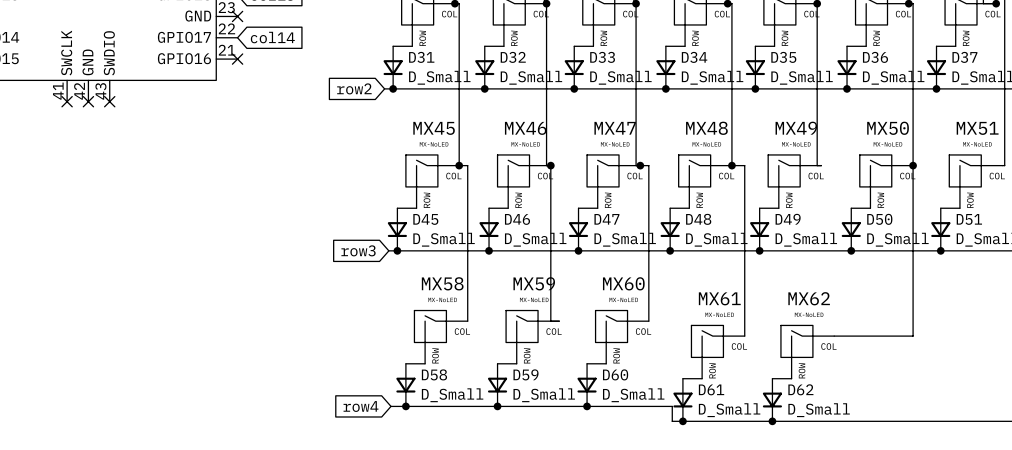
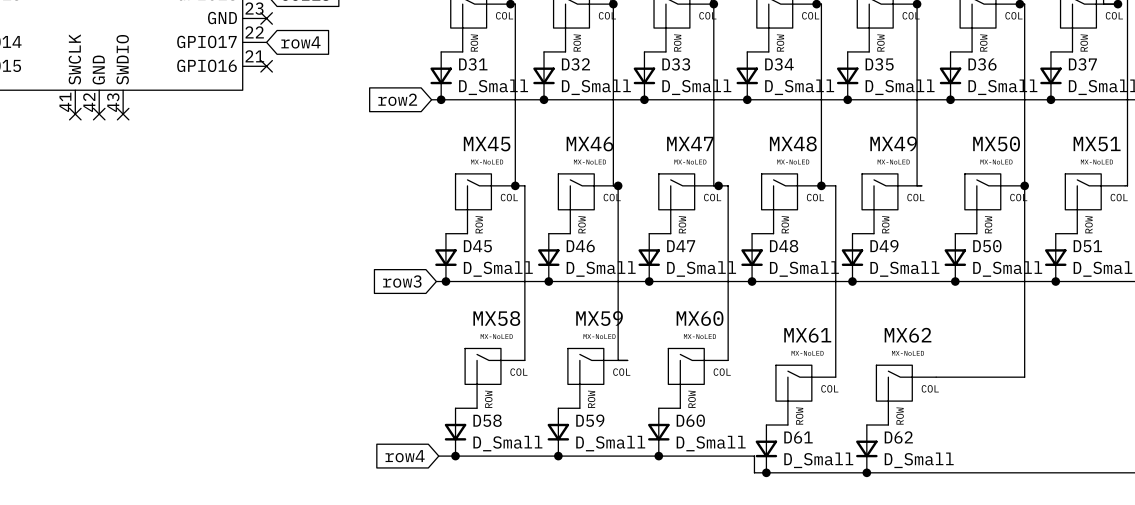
global label: col14 (272, 37) -> row4 (300, 42)

